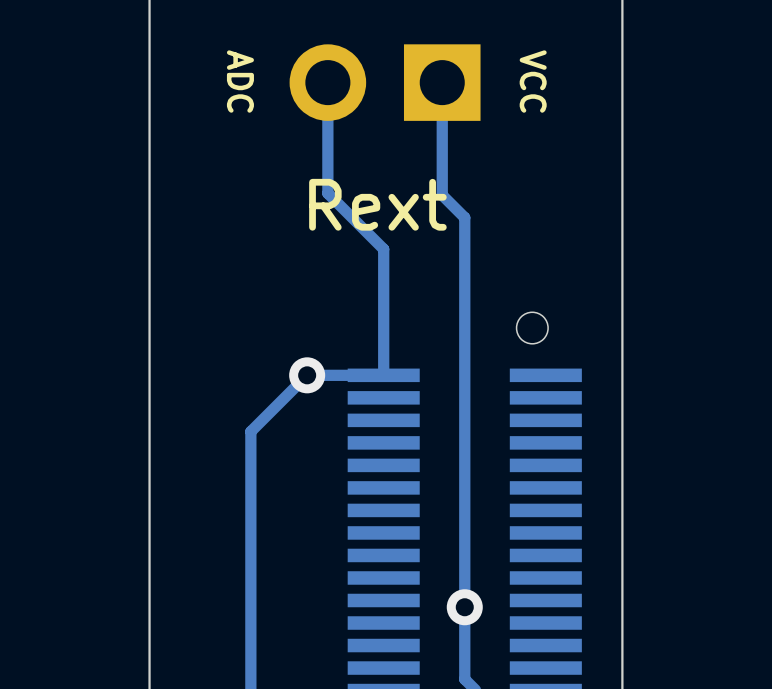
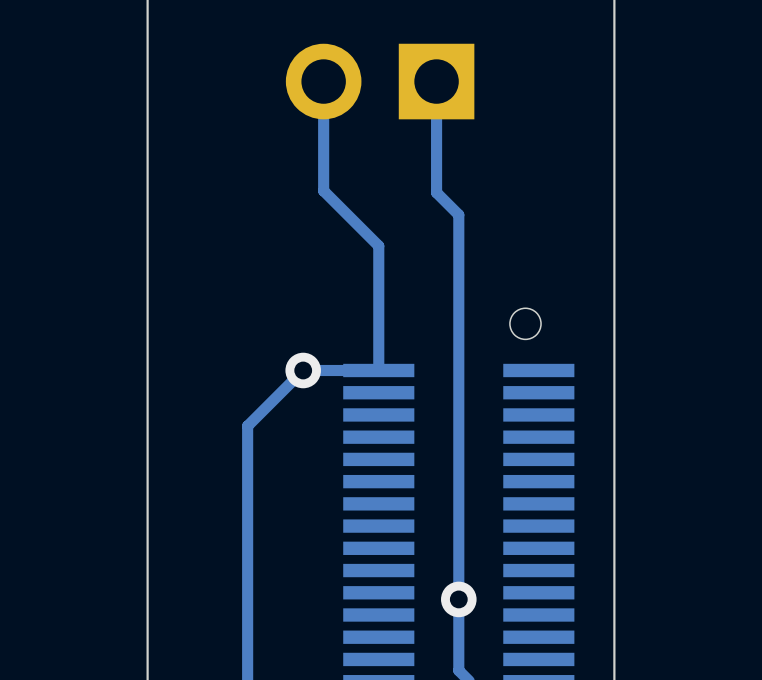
text: ADC (240, 81) -> none
text: VCC (533, 81) -> none
text: Rext (377, 204) -> none

